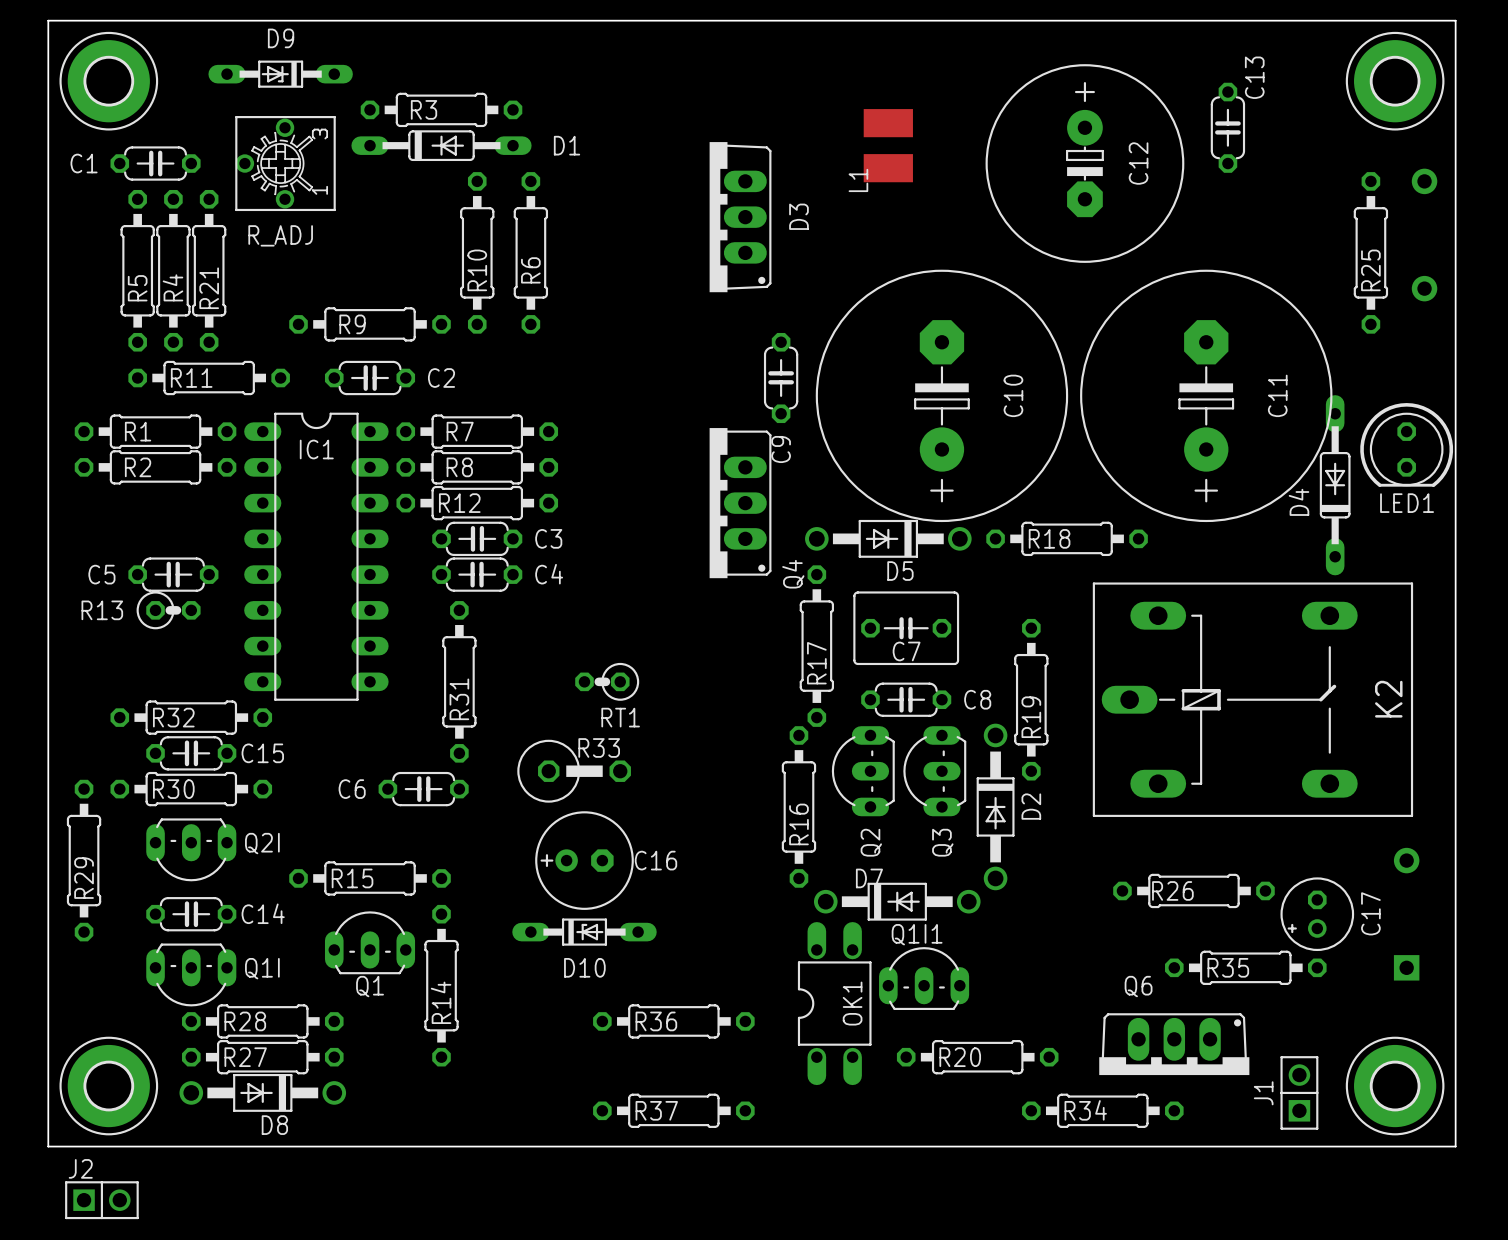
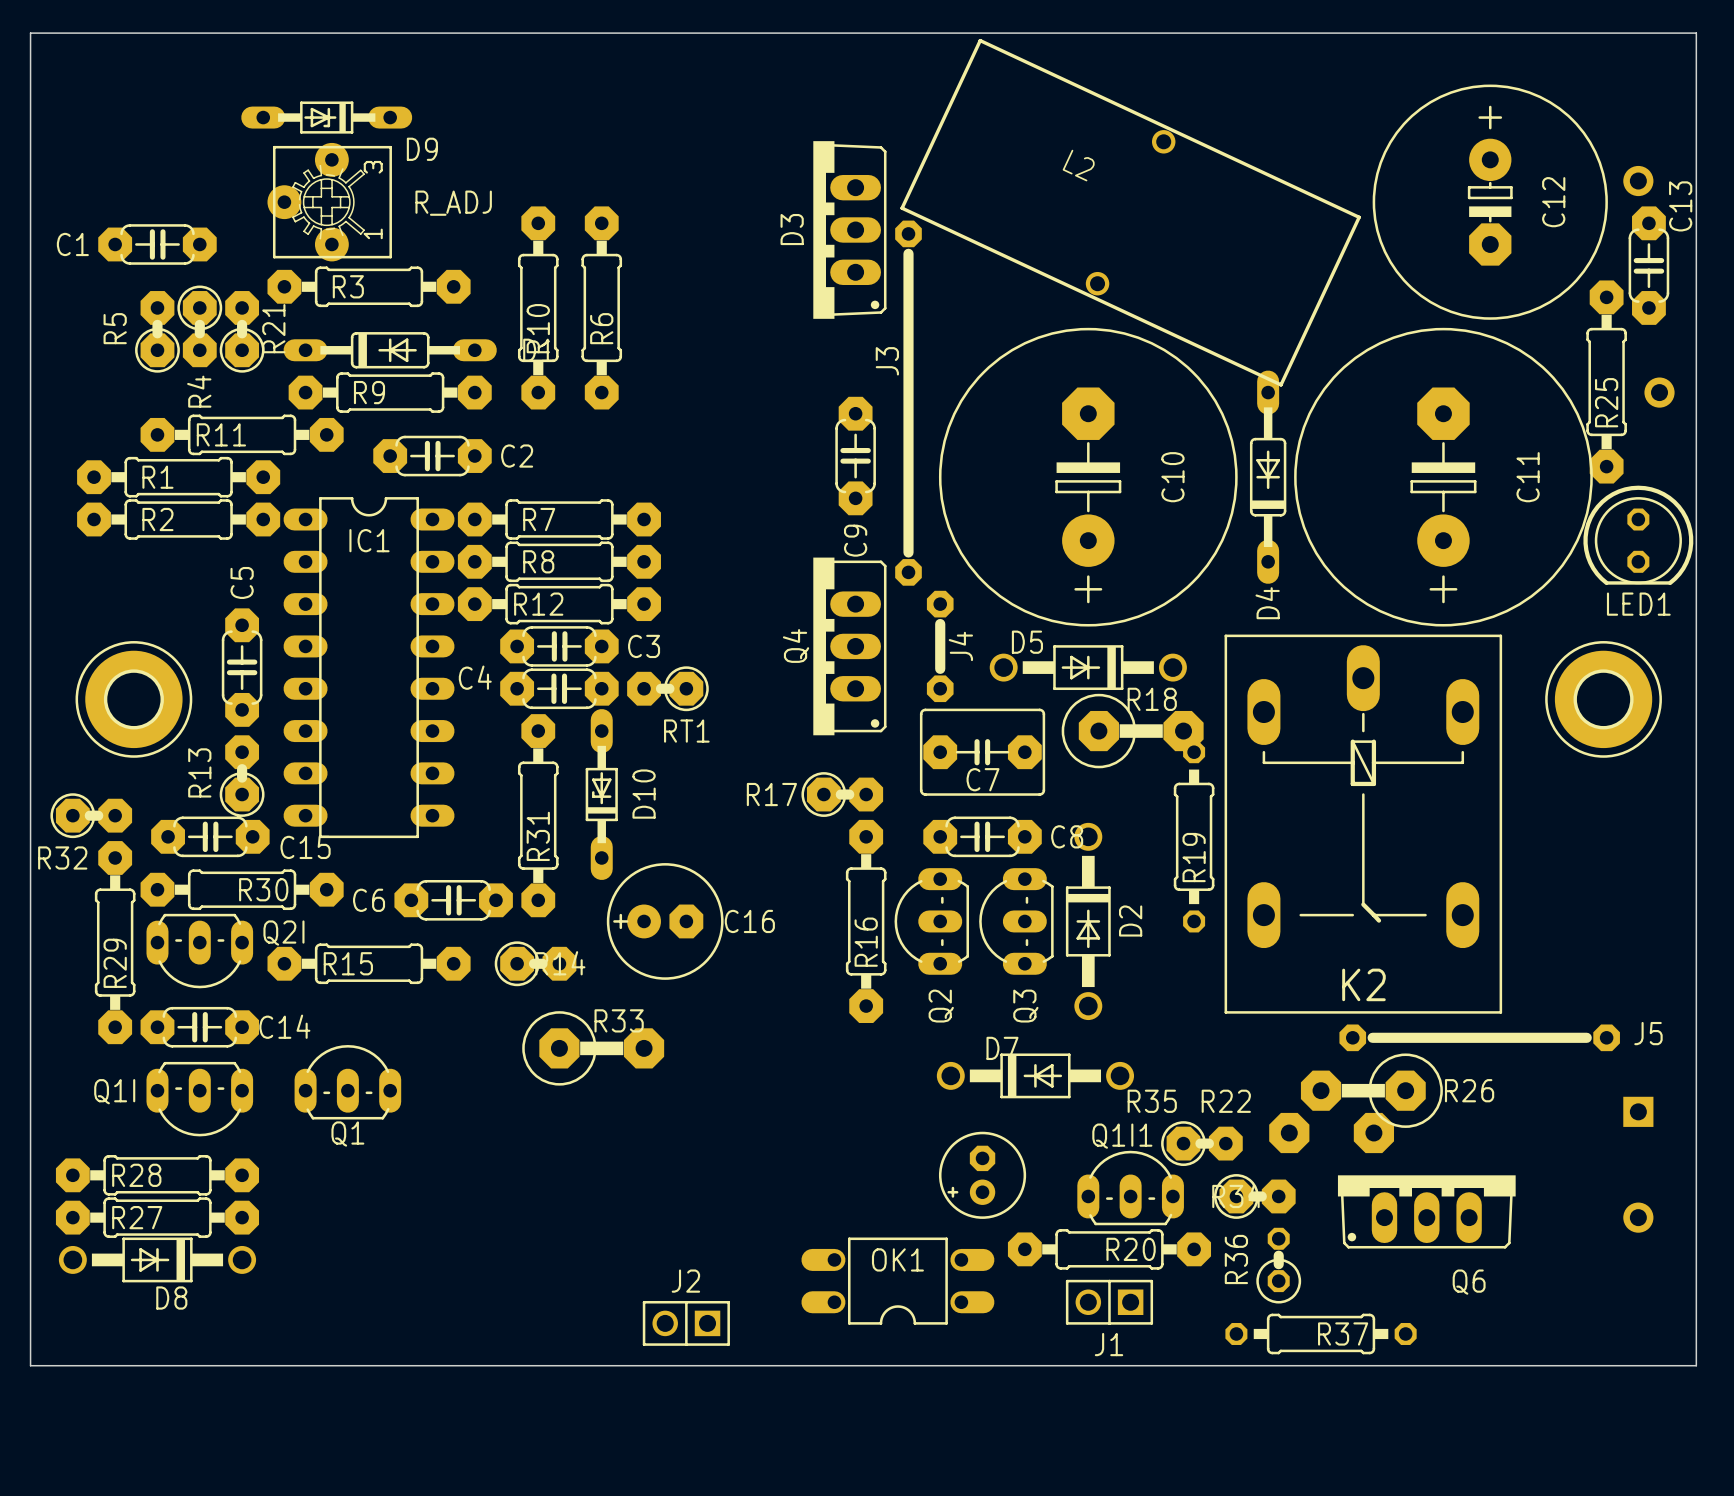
D9 name position: D9 (281, 38) -> D9 (422, 149)
D9 position: (280, 74) -> (326, 117)
part: (108, 81) -> none
part: (1395, 81) -> none
C13 footprint: [1210, 82, 1246, 173] -> [1628, 206, 1670, 325]
R3 footprint: [360, 92, 523, 128] -> [267, 266, 471, 308]
D1 position: (441, 145) -> (390, 350)
L1: (888, 145) -> none
C1 footprint: [110, 146, 201, 181] -> [98, 224, 217, 265]
R_ADJ: (285, 163) -> none
R_ADJ: none -> (329, 202)
C12 position: (1084, 163) -> (1490, 202)
R10 footprint: [460, 172, 495, 334] -> [517, 206, 559, 410]
R6 footprint: [513, 172, 549, 334] -> [581, 206, 623, 410]
L2: none -> (1130, 212)
R25 footprint: [1353, 172, 1389, 334] -> [1586, 280, 1627, 484]
part position: (1424, 181) -> (1638, 181)
R5 footprint: [120, 189, 155, 352] -> [135, 291, 180, 373]
R4 footprint: [156, 189, 191, 352] -> [177, 285, 223, 368]
R21 footprint: [192, 189, 227, 352] -> [219, 291, 265, 373]
D3 name position: D3 (798, 216) -> D3 (792, 229)
D3 position: (740, 217) -> (849, 229)
R4 name position: R4 (172, 287) -> R4 (199, 391)
R5 name position: R5 (137, 288) -> R5 (115, 328)
R21 name position: R21 (209, 288) -> R21 (273, 328)
part position: (1424, 288) -> (1659, 392)
R9 footprint: [289, 307, 451, 342] -> [288, 372, 492, 413]
C9 footprint: [763, 332, 799, 424] -> [835, 396, 876, 516]
J3: none -> (908, 403)
R11 footprint: [128, 360, 290, 396] -> [140, 414, 344, 456]
C2 footprint: [324, 360, 416, 396] -> [373, 435, 492, 477]
C11 position: (1206, 395) -> (1443, 477)
R1 footprint: [74, 414, 237, 449] -> [77, 456, 281, 498]
R7 footprint: [396, 414, 559, 449] -> [457, 499, 661, 540]
R2 footprint: [74, 450, 237, 485] -> [77, 499, 281, 540]
R8 footprint: [396, 450, 559, 485] -> [457, 541, 661, 583]
R12 footprint: [396, 485, 559, 521] -> [457, 583, 661, 625]
D4 position: (1335, 485) -> (1268, 477)
D4 name position: D4 (1299, 502) -> D4 (1267, 603)
Q4 position: (740, 503) -> (849, 646)
C3 footprint: [432, 521, 523, 557] -> [500, 626, 619, 667]
R18 footprint: [986, 521, 1148, 557] -> [1061, 693, 1204, 769]
J4: none -> (940, 646)
D5 position: (888, 538) -> (1088, 667)
R18 name position: R18 (1049, 538) -> R18 (1152, 699)
IC1 position: (316, 556) -> (369, 667)
C5 footprint: [128, 557, 219, 592] -> [221, 608, 263, 727]
C4 footprint: [432, 557, 523, 592] -> [500, 668, 619, 710]
R17 footprint: [799, 565, 835, 727] -> [801, 772, 884, 817]
D5 name position: D5 (900, 571) -> D5 (1027, 642)
C5 name position: C5 (101, 574) -> C5 (242, 582)
C4 name position: C4 (549, 574) -> C4 (475, 677)
Q4 name position: Q4 (793, 574) -> Q4 (796, 645)
part: none -> (133, 699)
part: none -> (1603, 699)
R13 footprint: [136, 591, 201, 630] -> [219, 735, 265, 817]
C7 footprint: [853, 591, 960, 666] -> [919, 708, 1046, 796]
R31 footprint: [442, 601, 477, 763] -> [517, 714, 559, 918]
R13 name position: R13 (102, 610) -> R13 (199, 772)
RT1 footprint: [575, 662, 640, 701] -> [627, 666, 709, 712]
R17 name position: R17 (816, 663) -> R17 (771, 794)
C8 footprint: [861, 682, 952, 717] -> [923, 816, 1042, 858]
K2 rotation: 0° (1252, 699) -> 90° clockwise (1363, 824)
R32 footprint: [110, 700, 273, 735] -> [50, 793, 133, 839]
R32 name position: R32 (173, 717) -> R32 (62, 857)
R16 footprint: [781, 726, 817, 888] -> [845, 819, 887, 1024]
C15 footprint: [146, 736, 237, 771] -> [151, 816, 270, 858]
R33 footprint: [517, 739, 631, 803] -> [522, 1011, 665, 1086]
R30 footprint: [110, 771, 273, 807] -> [140, 869, 344, 911]
C6 footprint: [378, 771, 469, 807] -> [394, 879, 513, 921]
Q2 position: (863, 771) -> (931, 921)
Q3 position: (934, 771) -> (1016, 921)
R29 footprint: [66, 779, 102, 942] -> [94, 841, 136, 1045]
R30 name position: R30 (173, 789) -> R30 (263, 889)
D2 position: (995, 806) -> (1088, 921)
C16 footprint: [535, 811, 634, 910] -> [606, 863, 724, 980]
Q2I name position: Q2I (262, 843) -> Q2I (283, 933)
Q2I position: (191, 849) -> (199, 951)
part position: (1406, 860) -> (1638, 1217)
R15 footprint: [289, 861, 451, 896] -> [267, 943, 471, 985]
J5: none -> (1479, 1037)
R26 footprint: [1113, 873, 1275, 909] -> [1300, 1053, 1443, 1128]
R26 name position: R26 (1172, 890) -> R26 (1469, 1090)
C14 footprint: [146, 897, 237, 932] -> [140, 1006, 260, 1048]
R14 footprint: [424, 904, 459, 1067] -> [494, 941, 577, 987]
C17: (1317, 914) -> none
D10 rotation: 0° (584, 932) -> 90° counterclockwise (601, 794)
D10 position: (584, 932) -> (601, 794)
Q1 position: (370, 942) -> (347, 1082)
R22: none -> (1331, 1133)
R35 footprint: [1165, 950, 1327, 985] -> [1161, 1121, 1243, 1167]
R35 name position: R35 (1228, 967) -> R35 (1152, 1101)
part position: (1406, 967) -> (1638, 1111)
Q1I name position: Q1I (262, 968) -> Q1I (114, 1091)
Q1I position: (191, 974) -> (199, 1099)
Q1I1 position: (924, 978) -> (1130, 1188)
part: none -> (982, 1175)
OK1 rotation: 0° (834, 1003) -> 90° counterclockwise (897, 1281)
R28 footprint: [181, 1004, 344, 1039] -> [55, 1155, 260, 1196]
R36 footprint: [593, 1004, 755, 1039] -> [1256, 1227, 1302, 1304]
R27 footprint: [181, 1040, 344, 1075] -> [55, 1197, 260, 1238]
R20 footprint: [896, 1040, 1059, 1075] -> [1007, 1229, 1212, 1270]
Q6 rotation: 0° (1174, 1044) -> 180° (1426, 1211)
R20 name position: R20 (960, 1057) -> R20 (1131, 1249)
part: (108, 1086) -> none
part: (1395, 1086) -> none
D8 position: (262, 1092) -> (157, 1259)
J1 rotation: 0° (1299, 1092) -> 90° counterclockwise (1109, 1302)
J1 position: (1299, 1092) -> (1109, 1302)
R34 footprint: [1022, 1093, 1184, 1128] -> [1213, 1174, 1296, 1219]
R37 name position: R37 (656, 1110) -> R37 (1343, 1333)
R37 position: (673, 1110) -> (1321, 1333)
J2 rotation: 0° (101, 1200) -> 180° (686, 1323)
J2 position: (101, 1200) -> (686, 1323)

